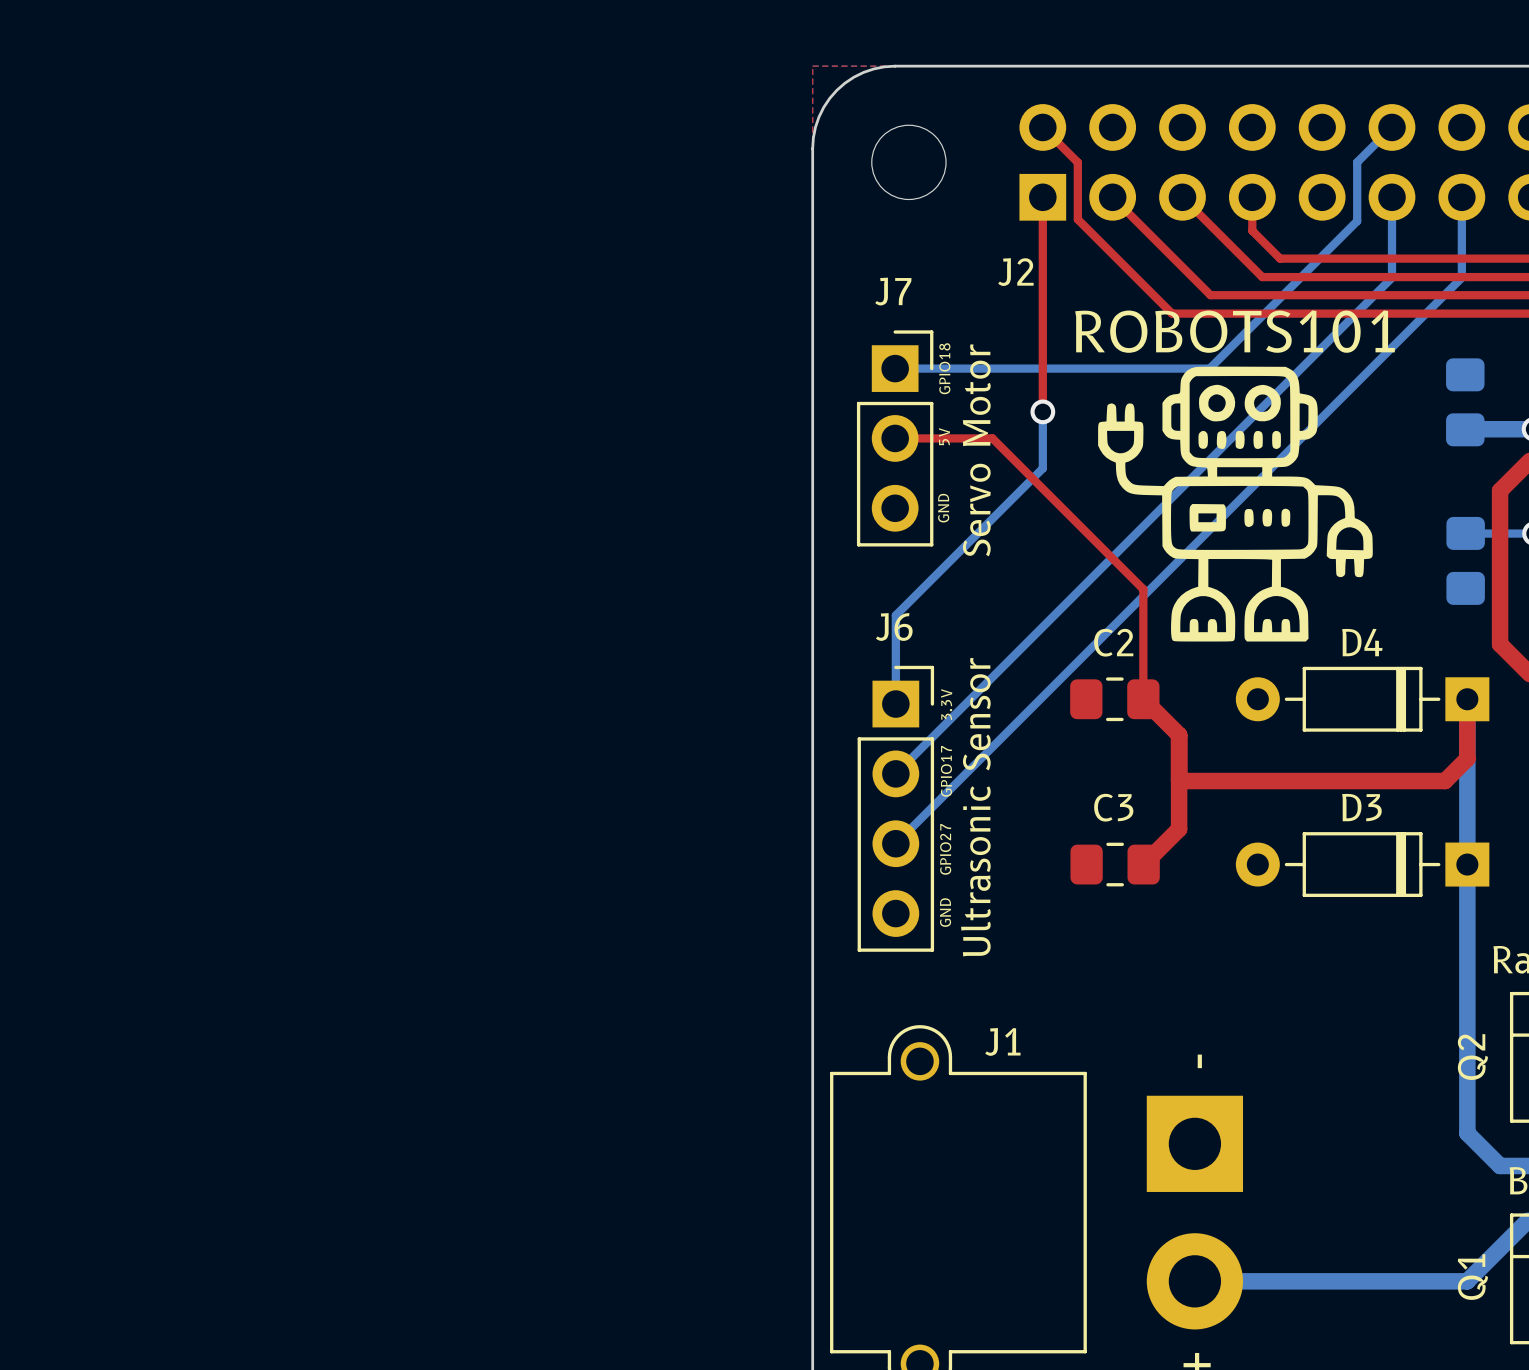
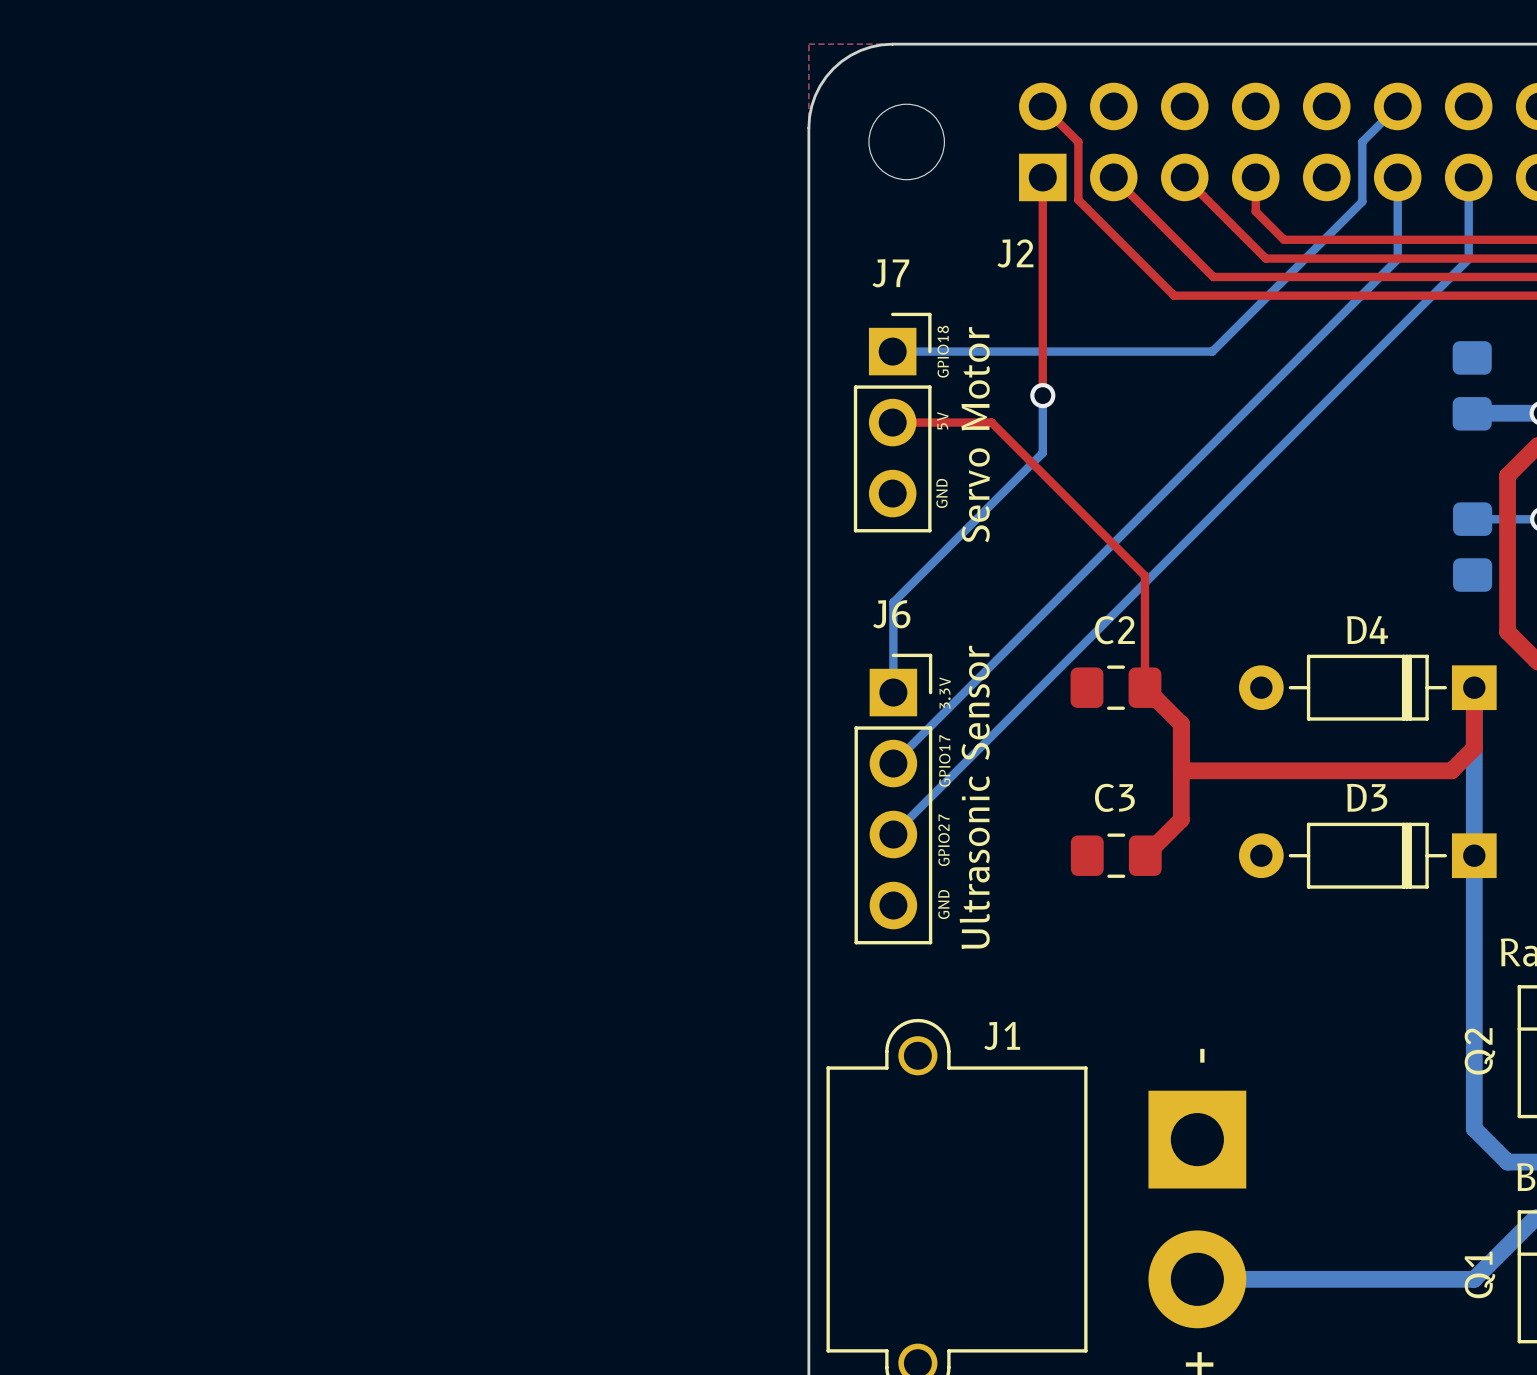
ROBOTS101: (1235, 504) -> none

